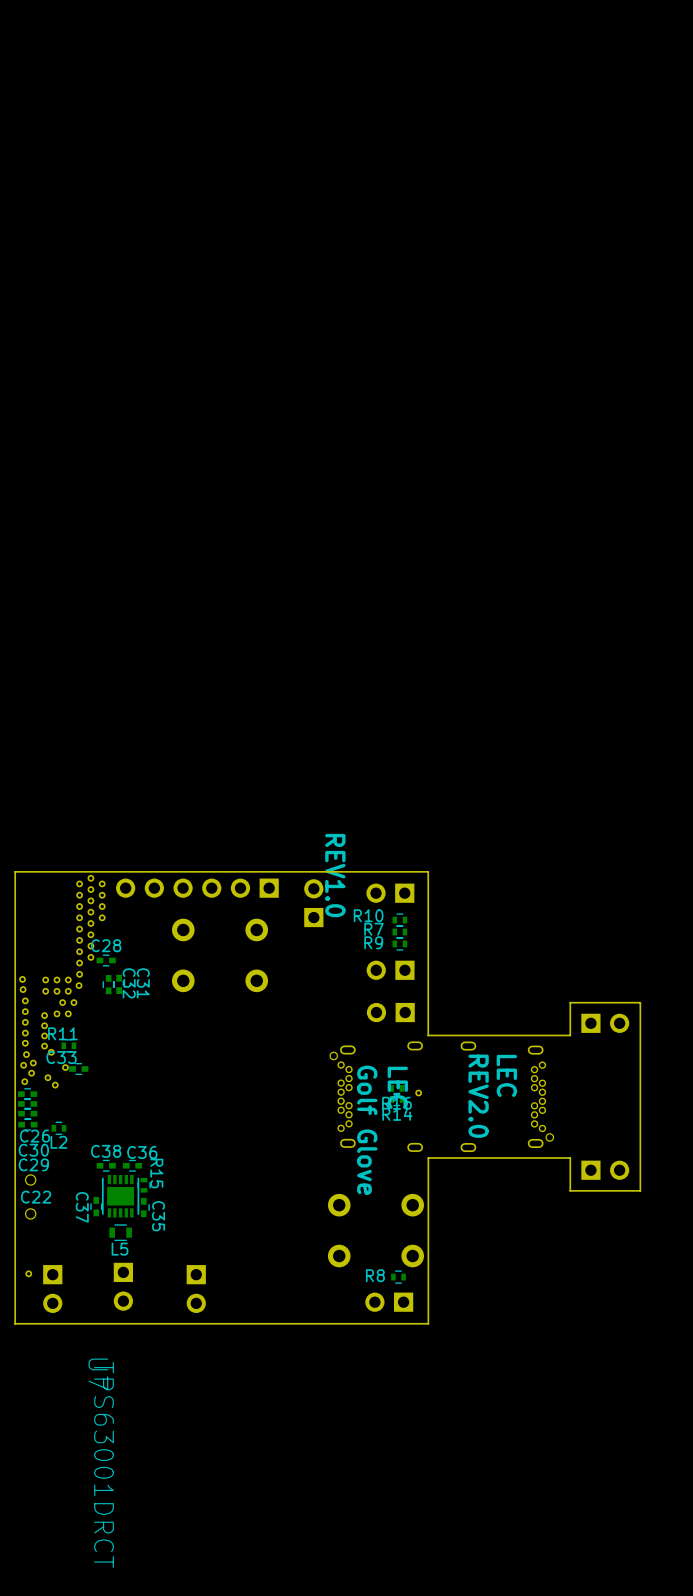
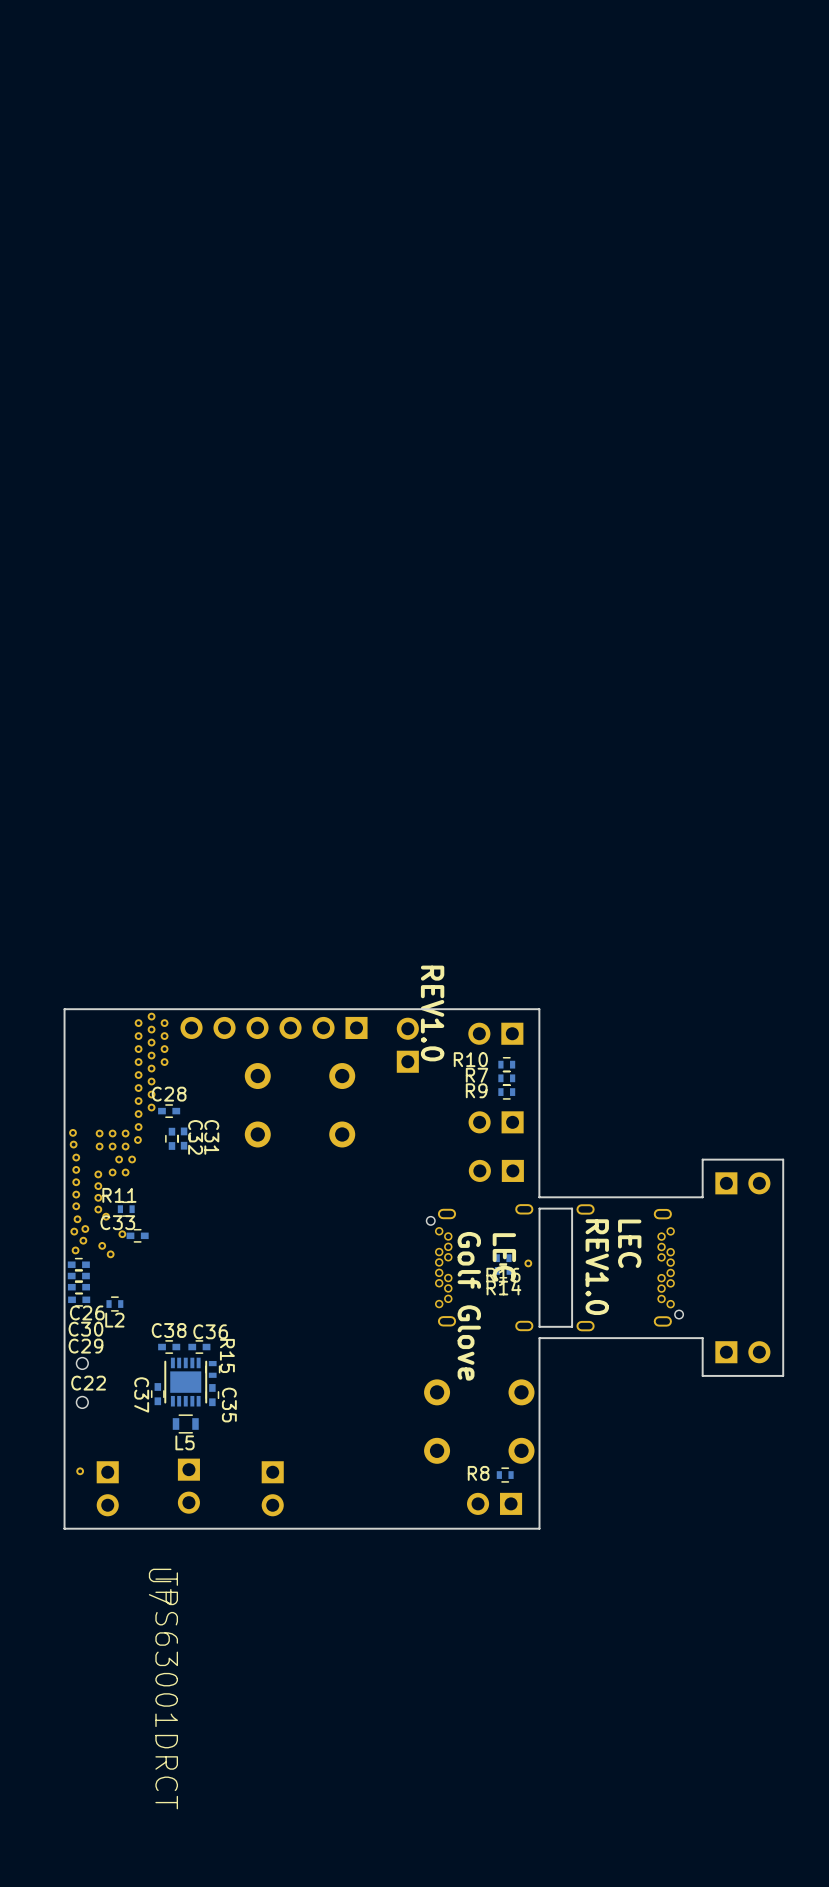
text: REV2.0 (478, 1096) -> REV1.0 (597, 1267)
board edge: none -> (539, 1326) (539, 1208) (572, 1208) (572, 1326) (539, 1326)

